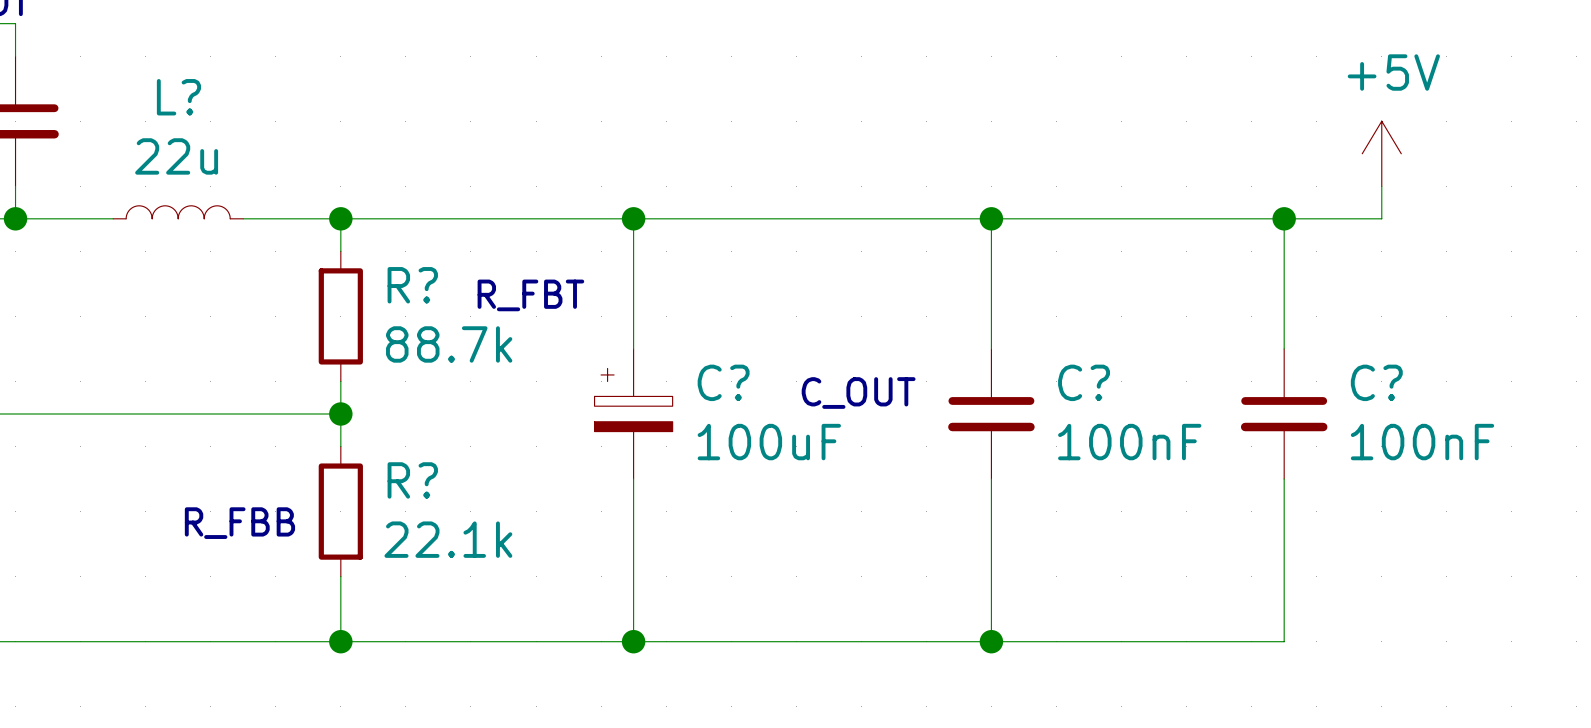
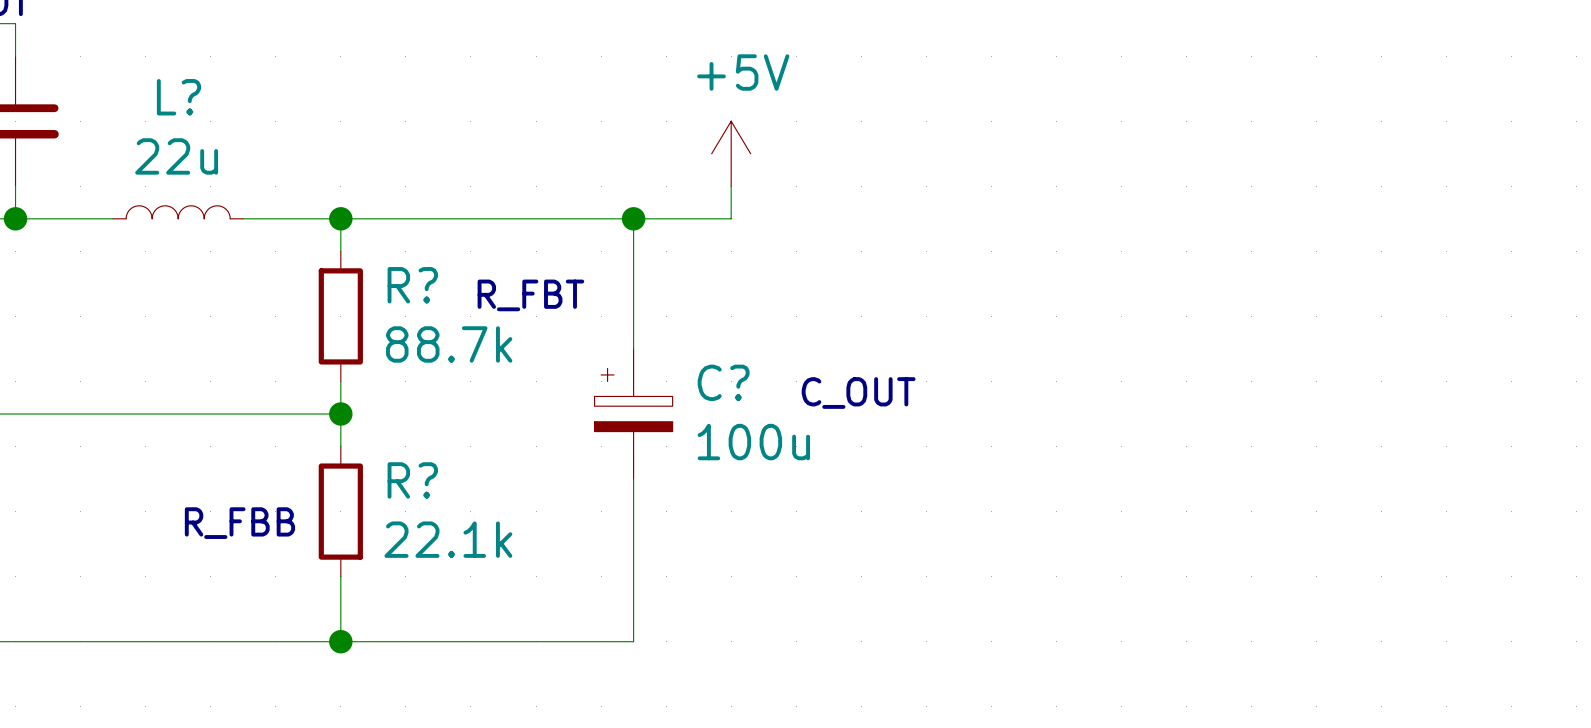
power symbol: none -> +5V (731, 153)
power symbol: +5V (1381, 153) -> none
wire: (1381, 186) (1381, 218) (731, 218) -> (731, 186) (731, 218)
wire: (991, 218) (991, 348) -> none
junction: (991, 218) -> none
wire: (1284, 218) (1284, 348) -> none
junction: (1284, 218) -> none
C?: 100nF (991, 413) -> none
C?: 100nF (1284, 413) -> none
C? value: 100uF (769, 442) -> 100u (753, 442)
wire: (991, 479) (991, 641) -> none
wire: (1284, 479) (1284, 641) (633, 641) -> none
junction: (633, 641) -> none
junction: (991, 641) -> none

